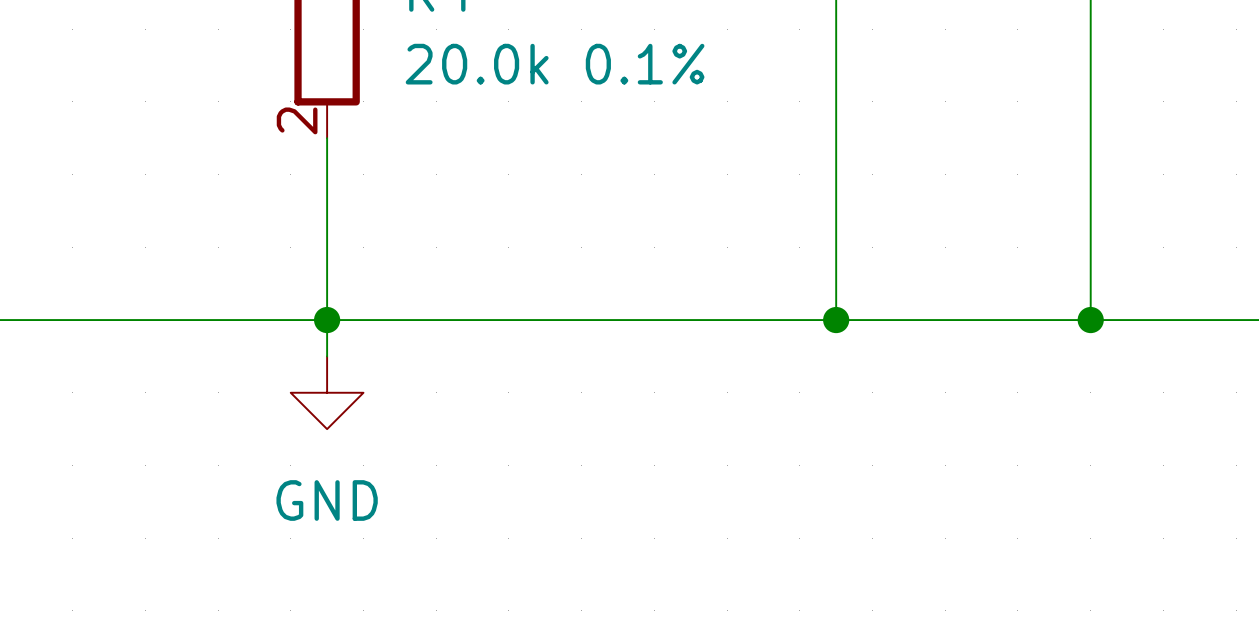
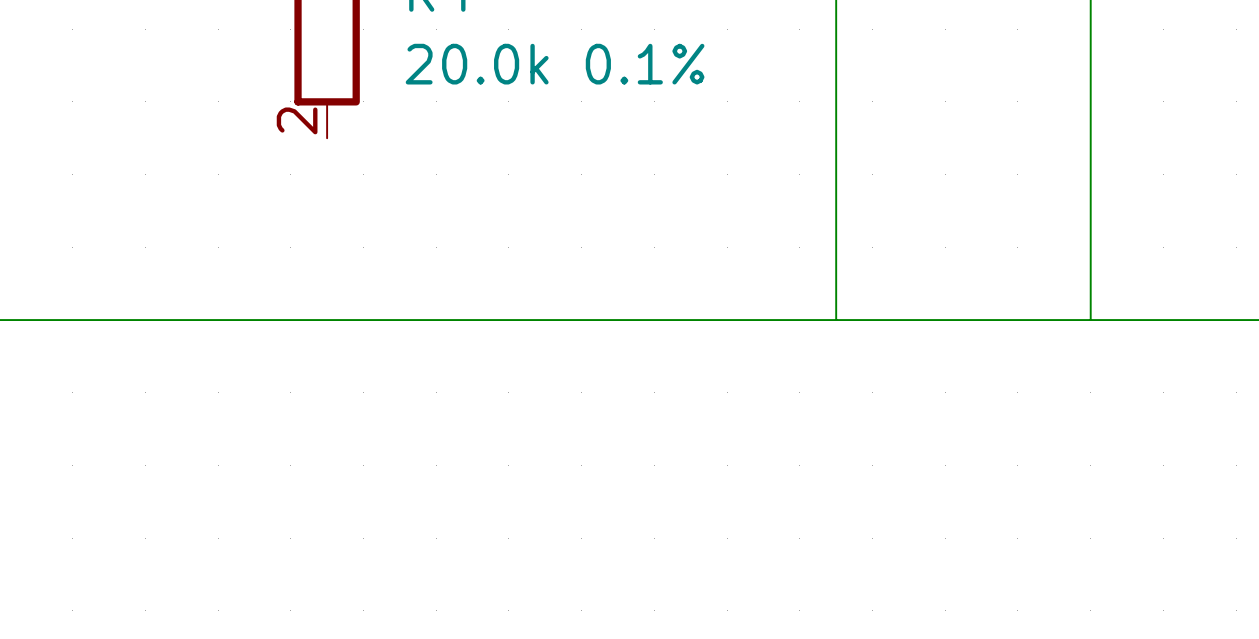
wire: (327, 138) (327, 356) -> none
junction: (327, 320) -> none
junction: (836, 320) -> none
junction: (1090, 320) -> none
power symbol: GND (327, 392) -> none

